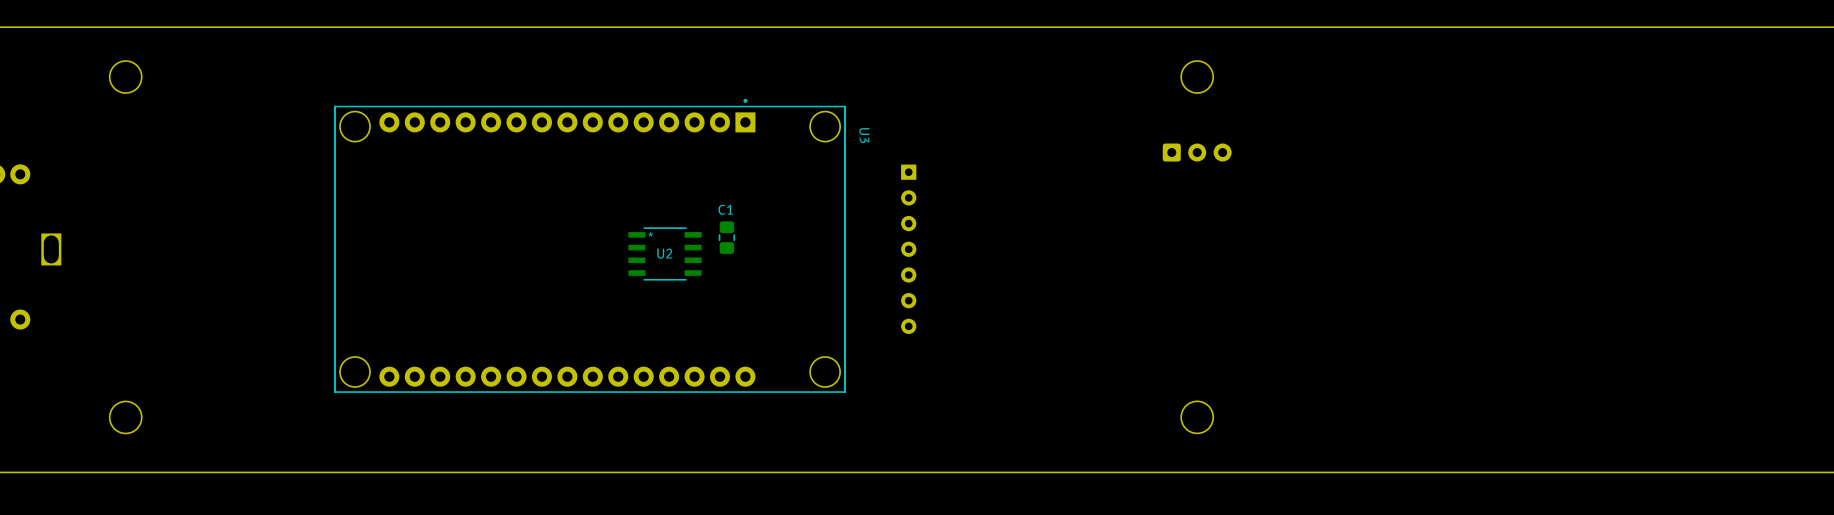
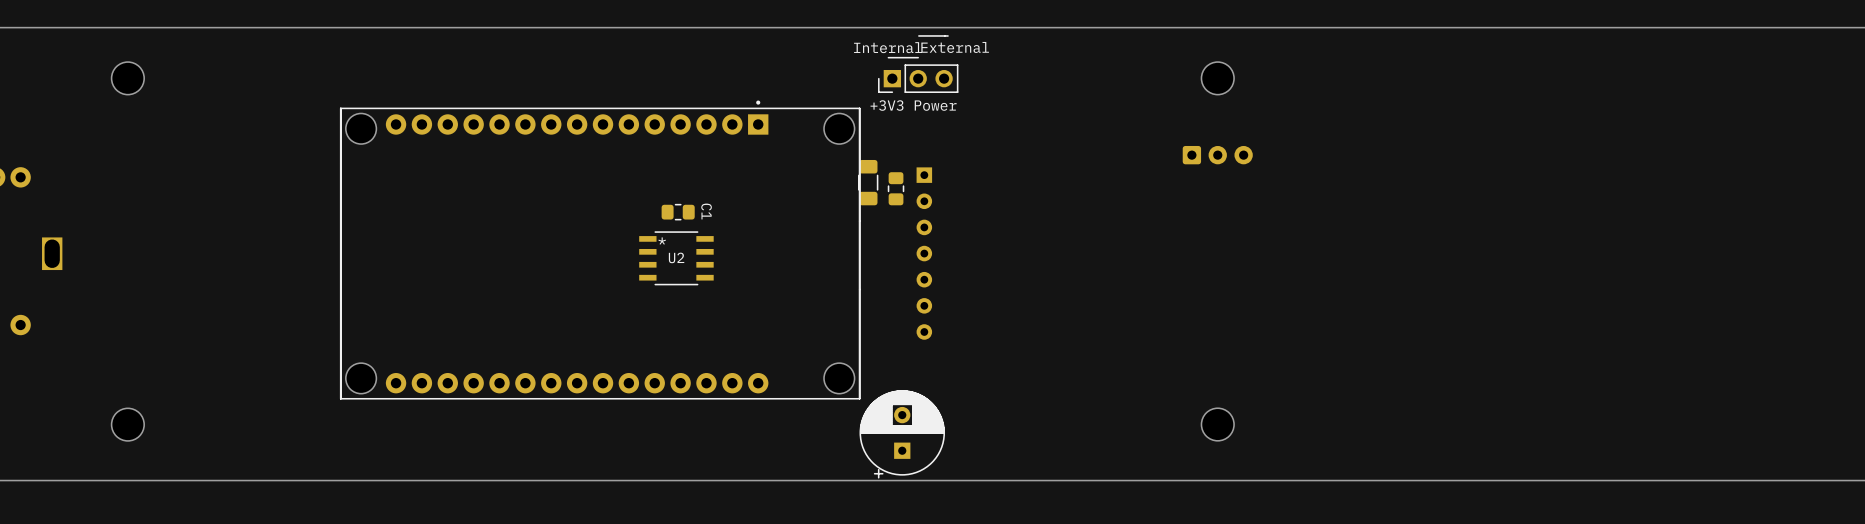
line: none -> (948, 35) (918, 35)
text: none -> Internal (887, 47)
text: none -> External (955, 47)
line: none -> (918, 57) (888, 57)
part: none -> (918, 78)
text: none -> +3V3 Power (913, 105)
U3 name: U3 (864, 135) -> none
part: none -> (868, 182)
part: none -> (896, 188)
C1 rotation: 0° (726, 237) -> 90° clockwise (678, 212)
C1 position: (726, 237) -> (678, 212)
part: none -> (902, 434)

